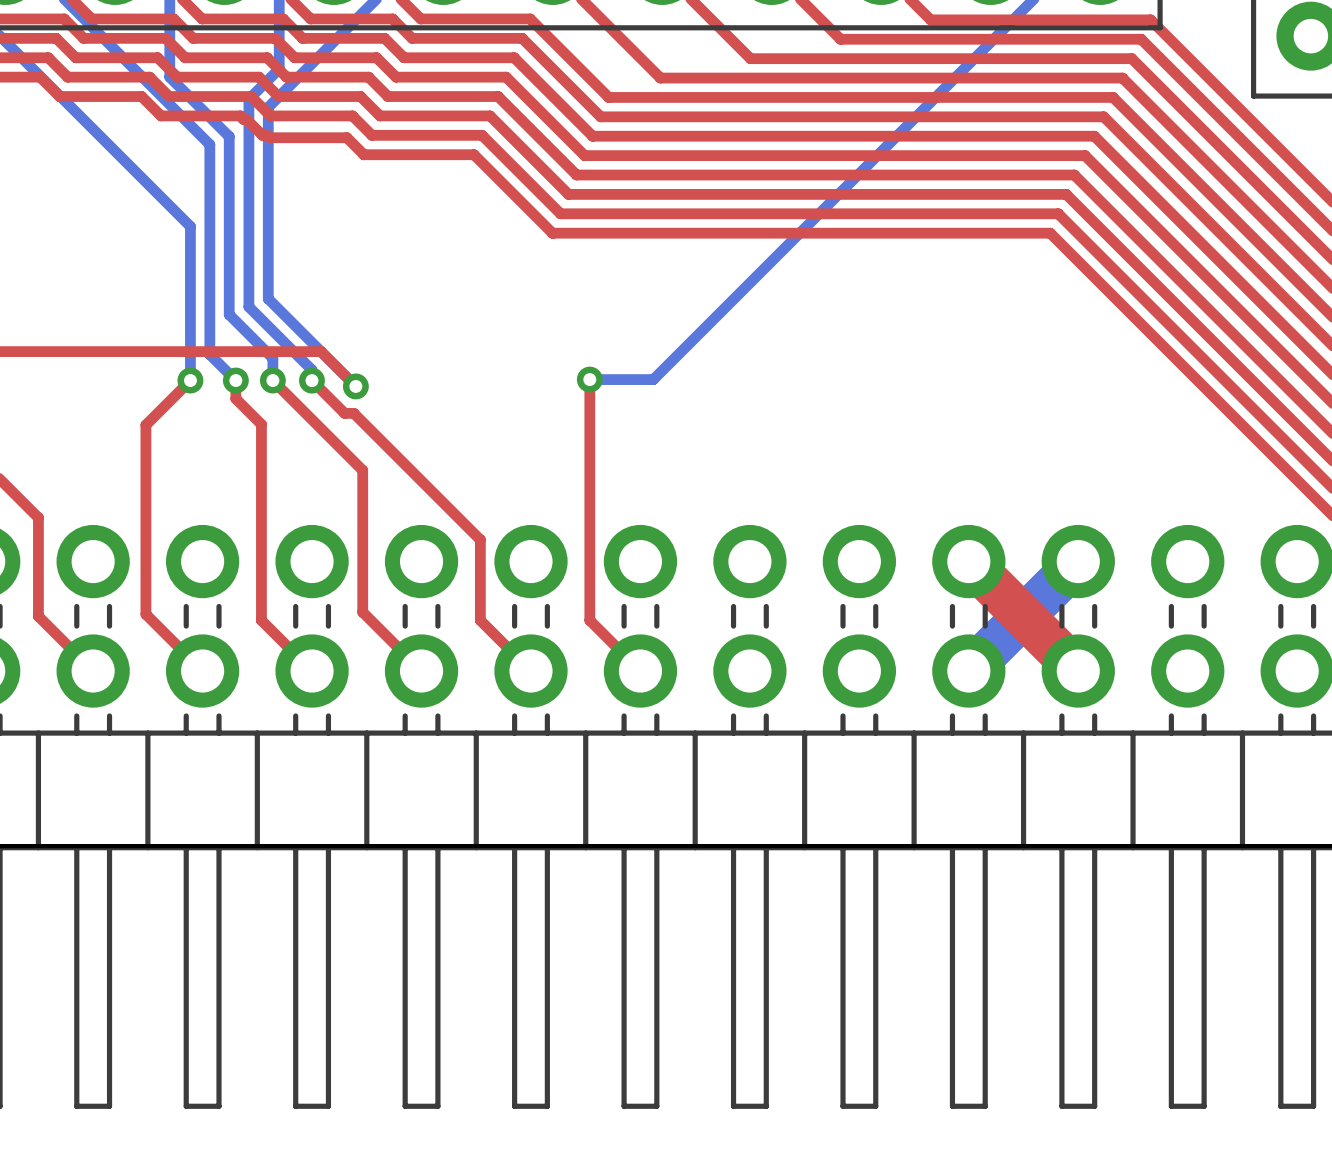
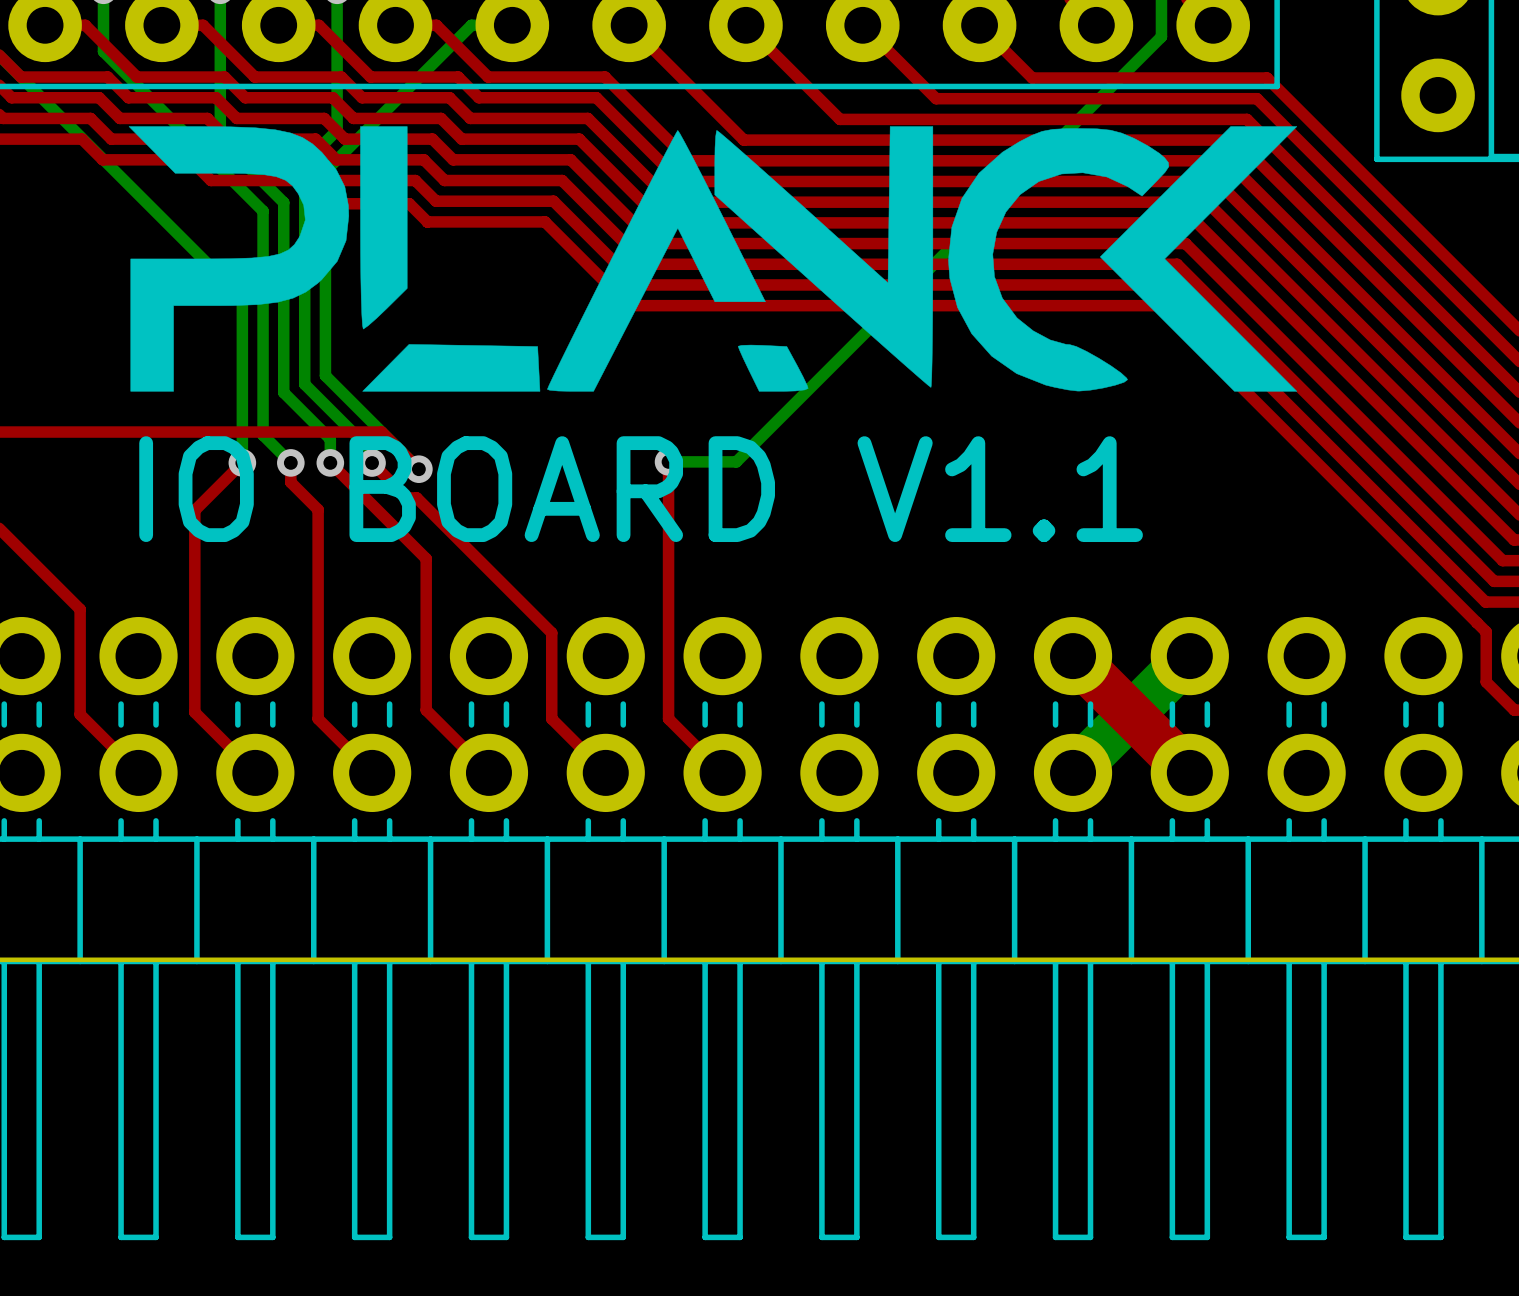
drawing: none -> [128, 126, 1298, 392]
text: none -> IO BOARD V1.1 (641, 489)

